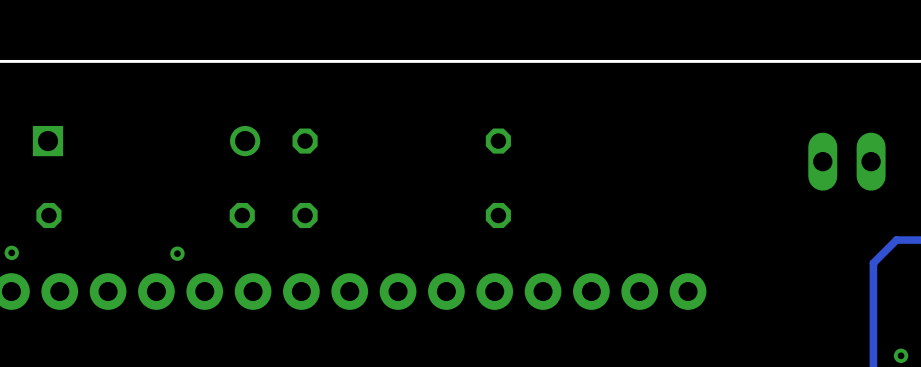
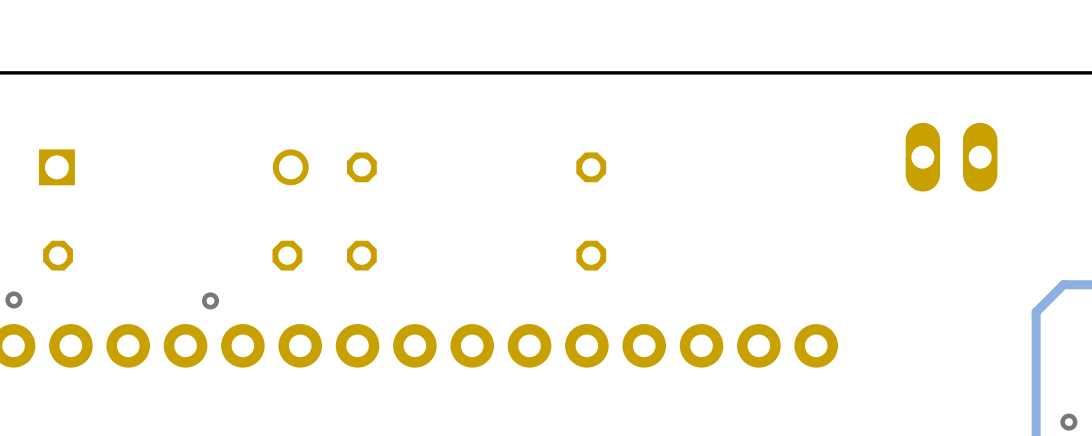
part position: (846, 161) -> (951, 157)

